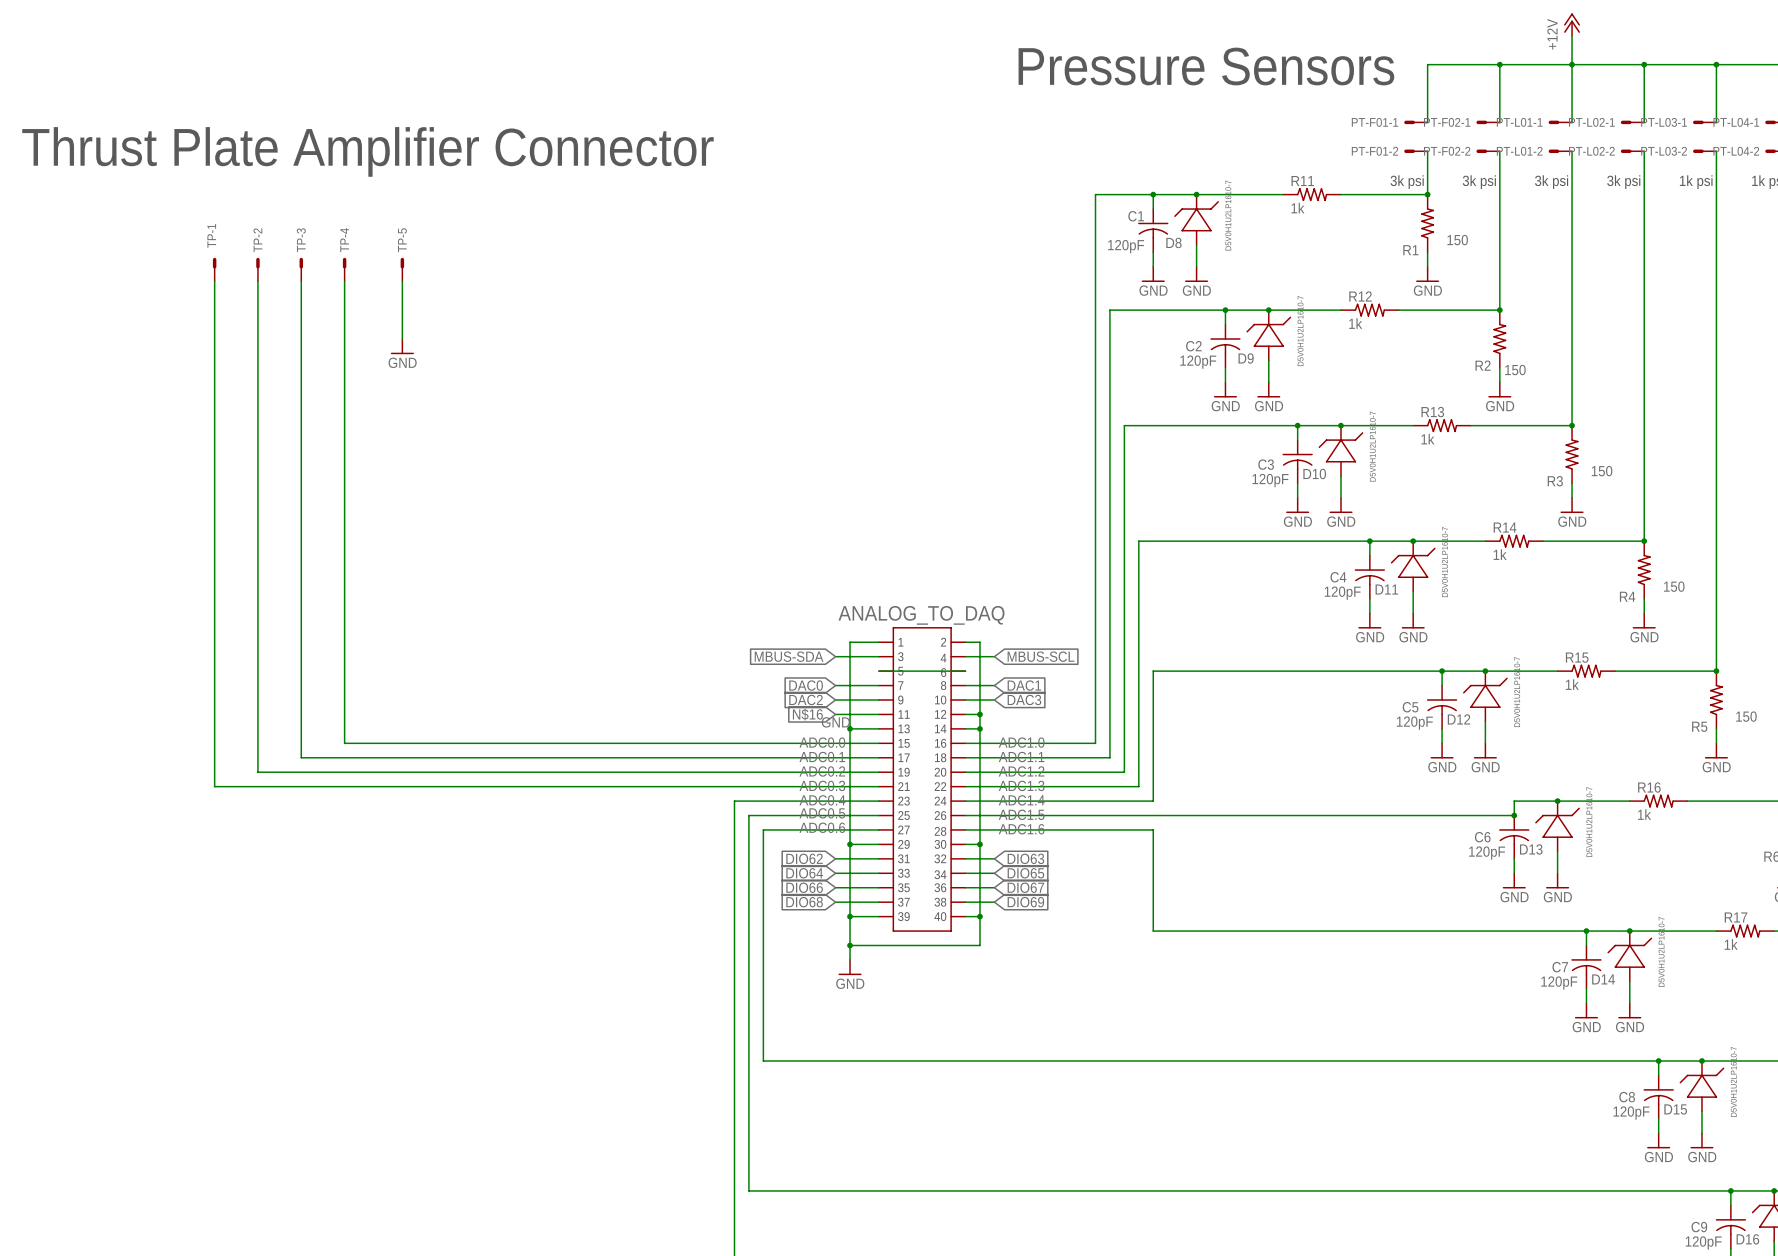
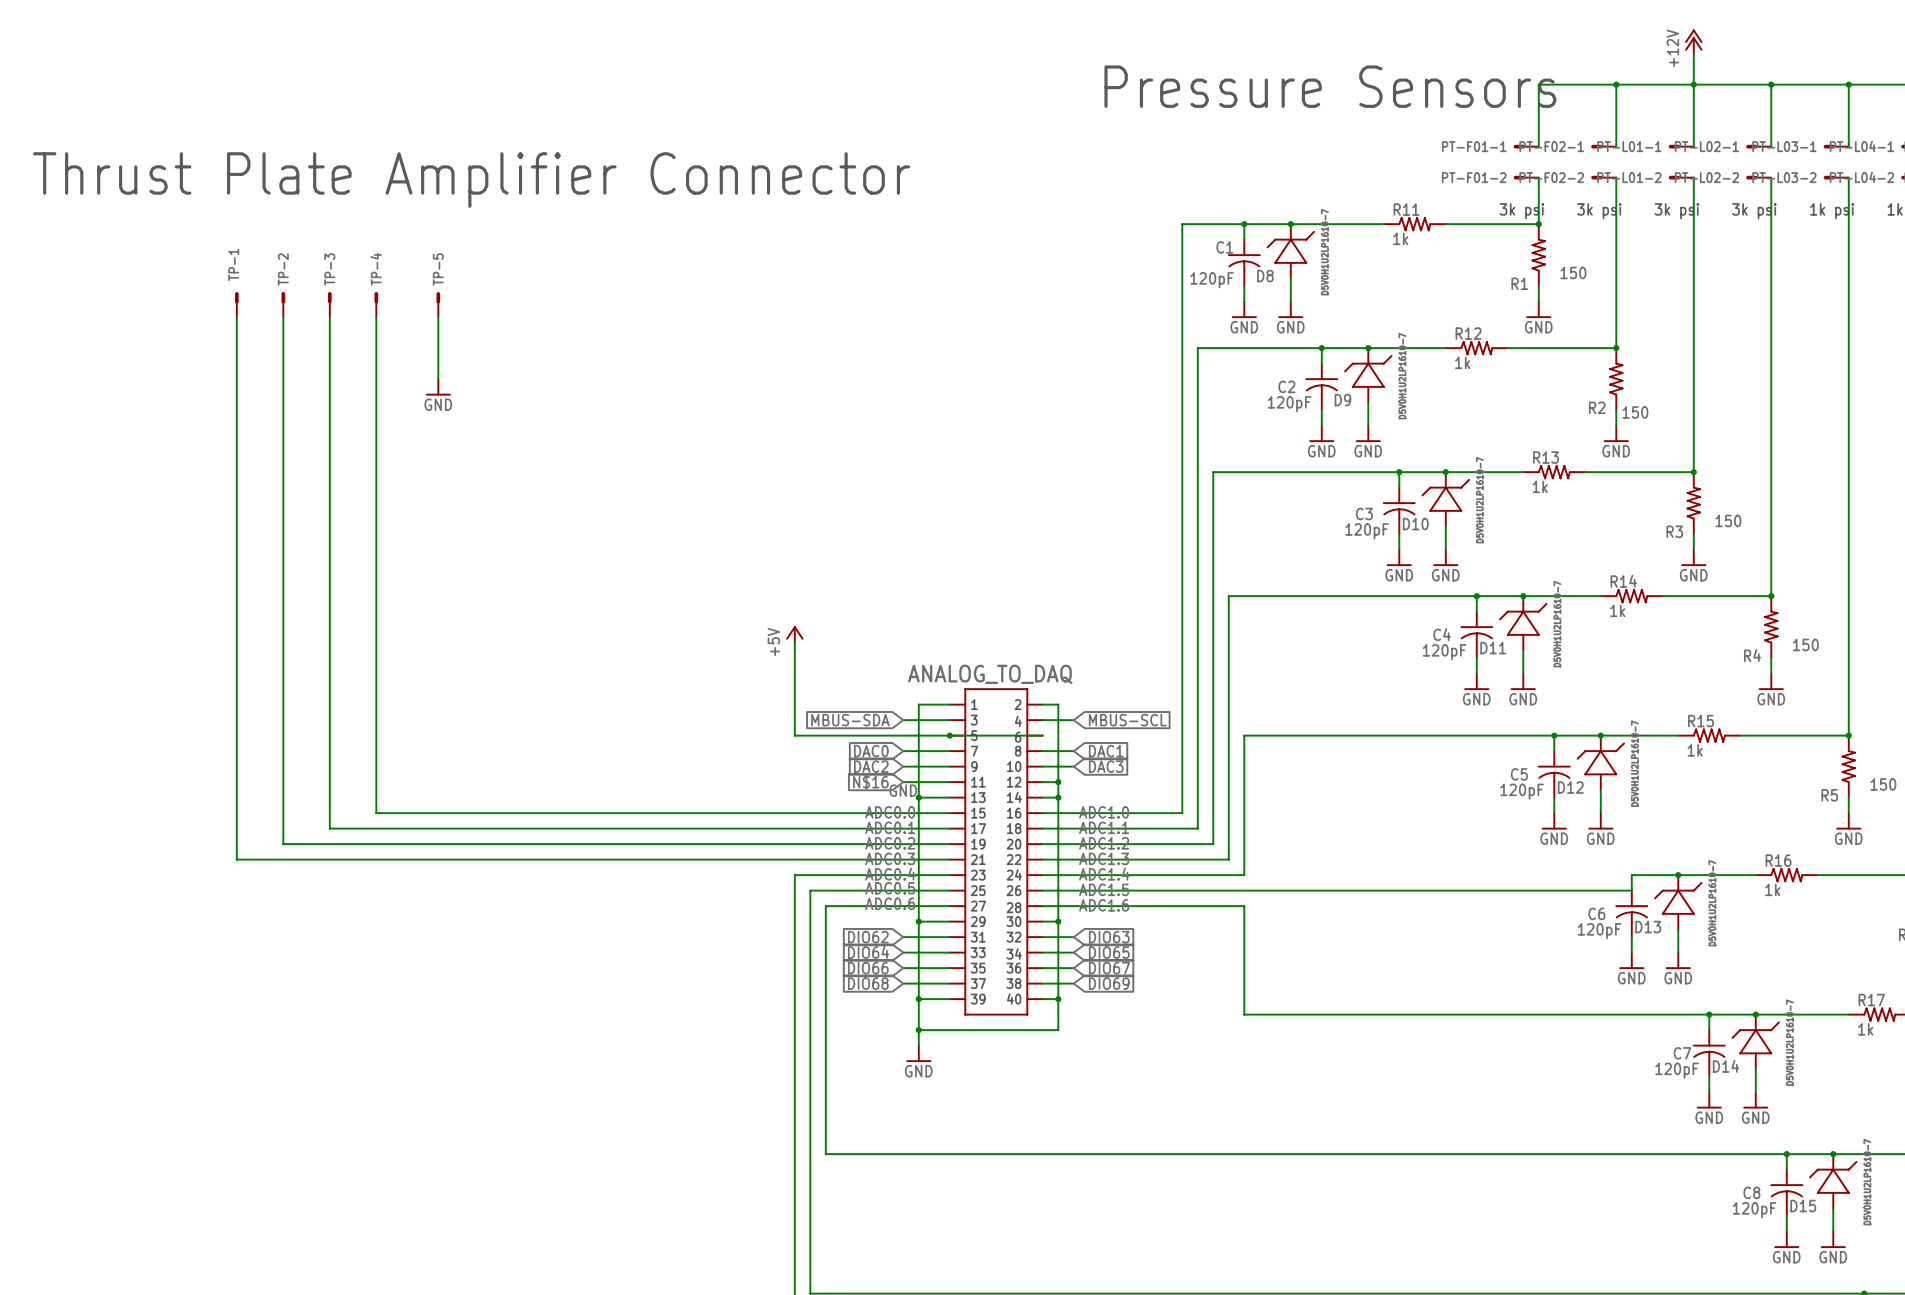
power symbol: none -> +5V (794, 634)
wire: none -> (794, 642) (794, 735) (949, 735)
junction: none -> (949, 735)
junction: (1514, 815) -> none

